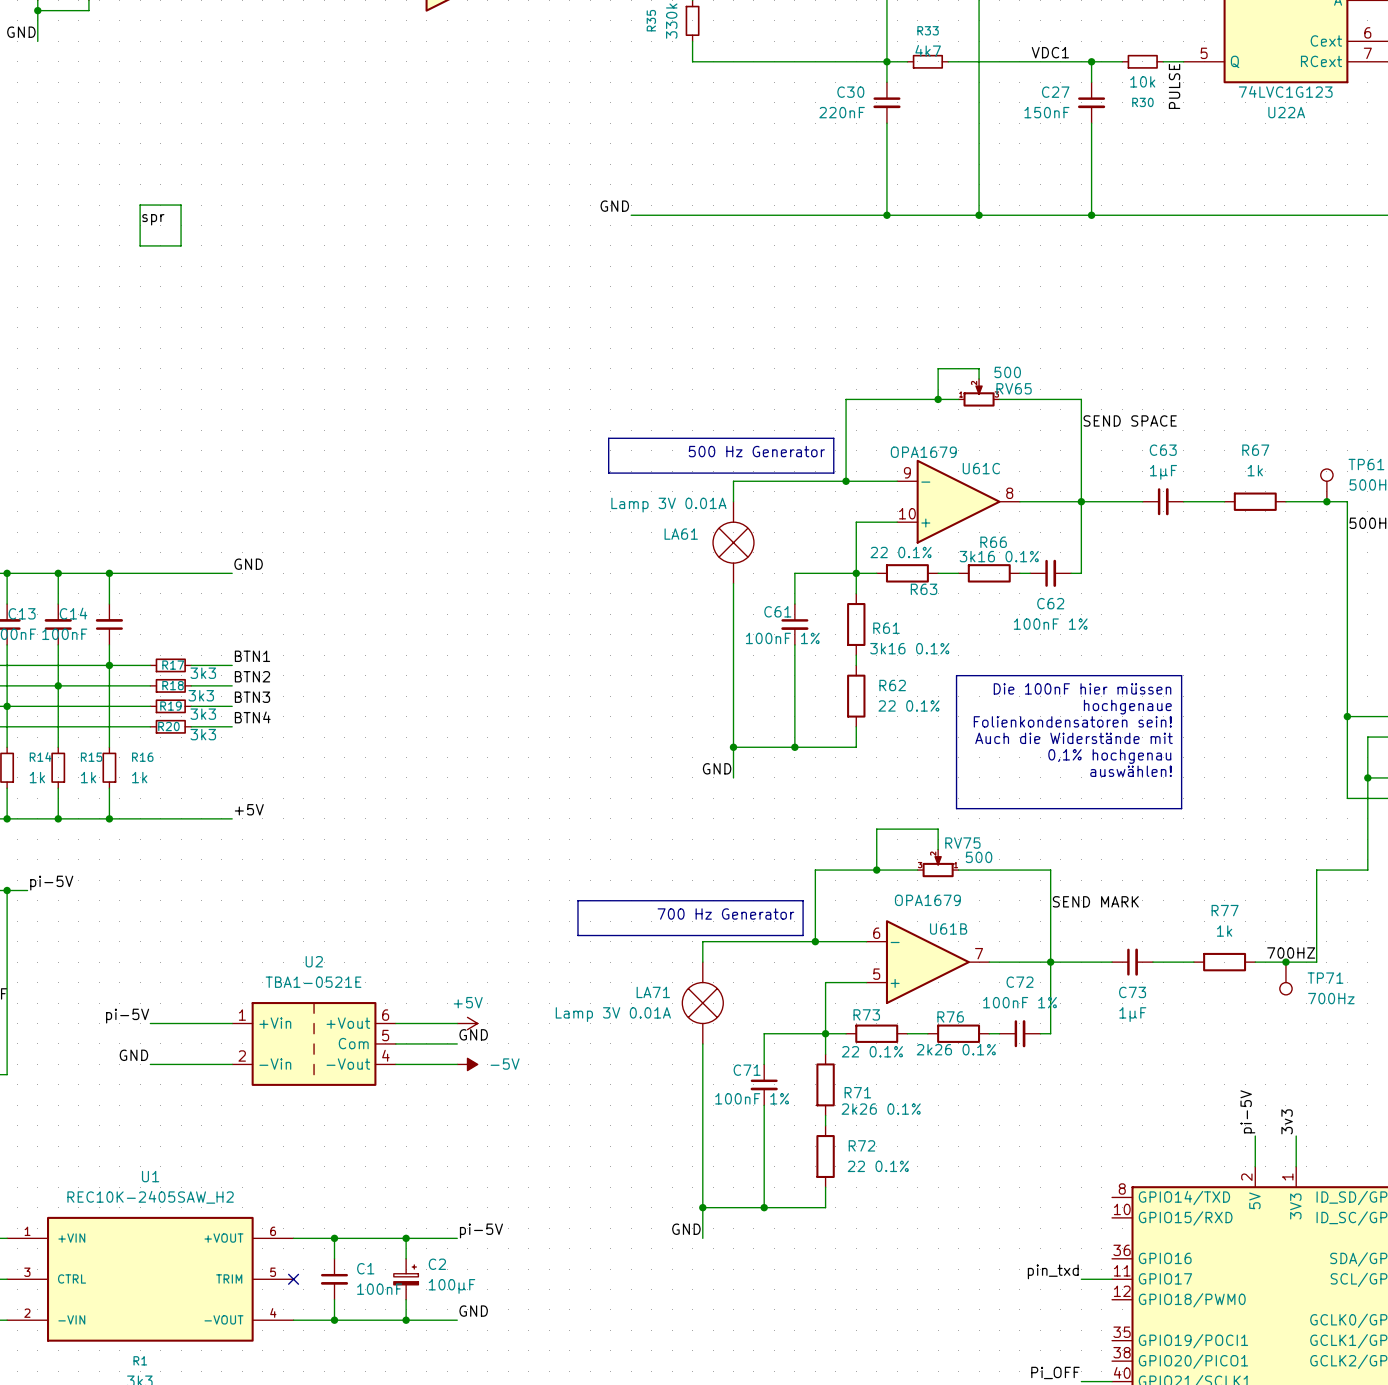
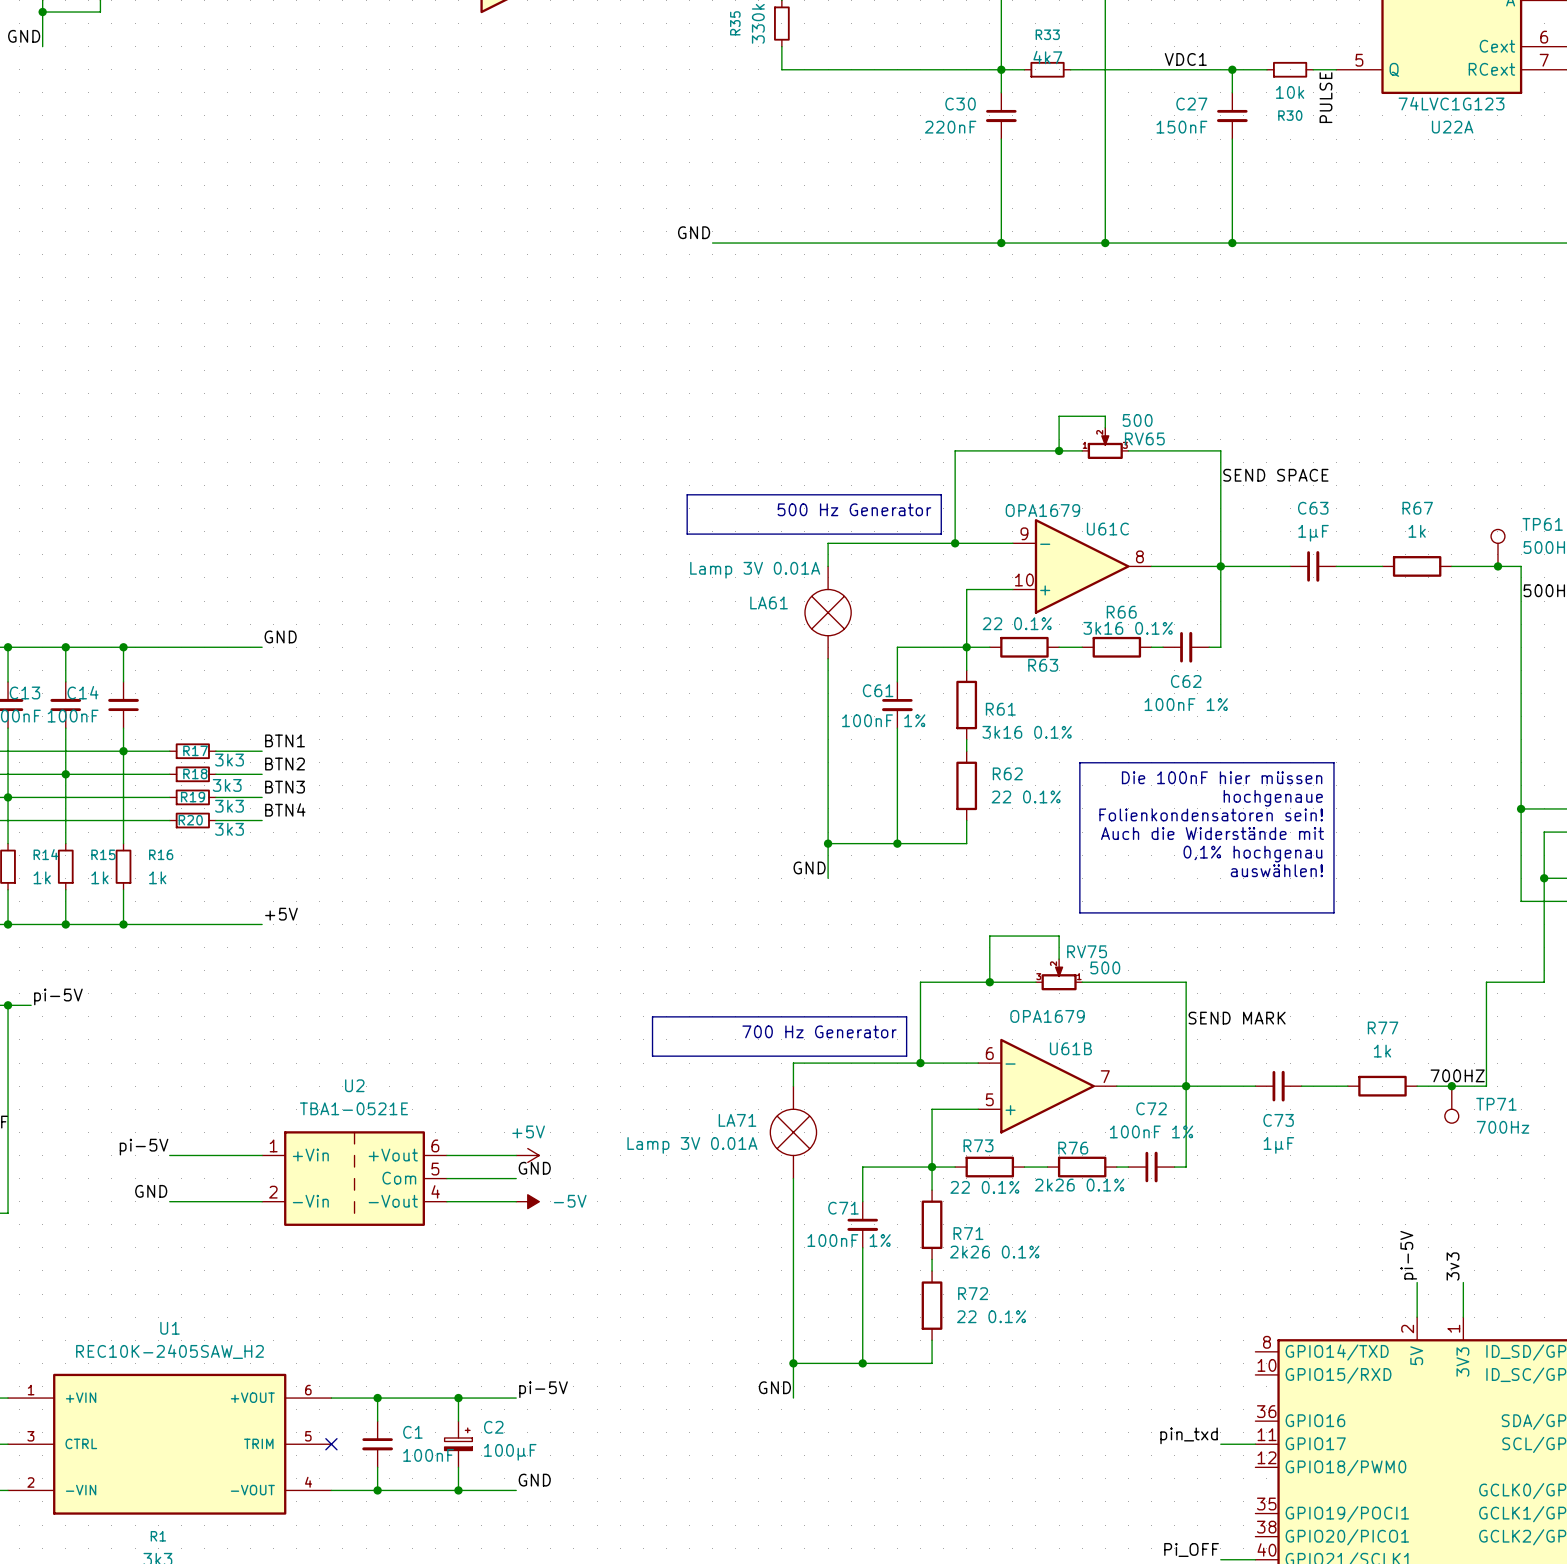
wire: (140, 205) (140, 245) (181, 245) (181, 205) (140, 205) -> none
label: spr (153, 219) -> none

